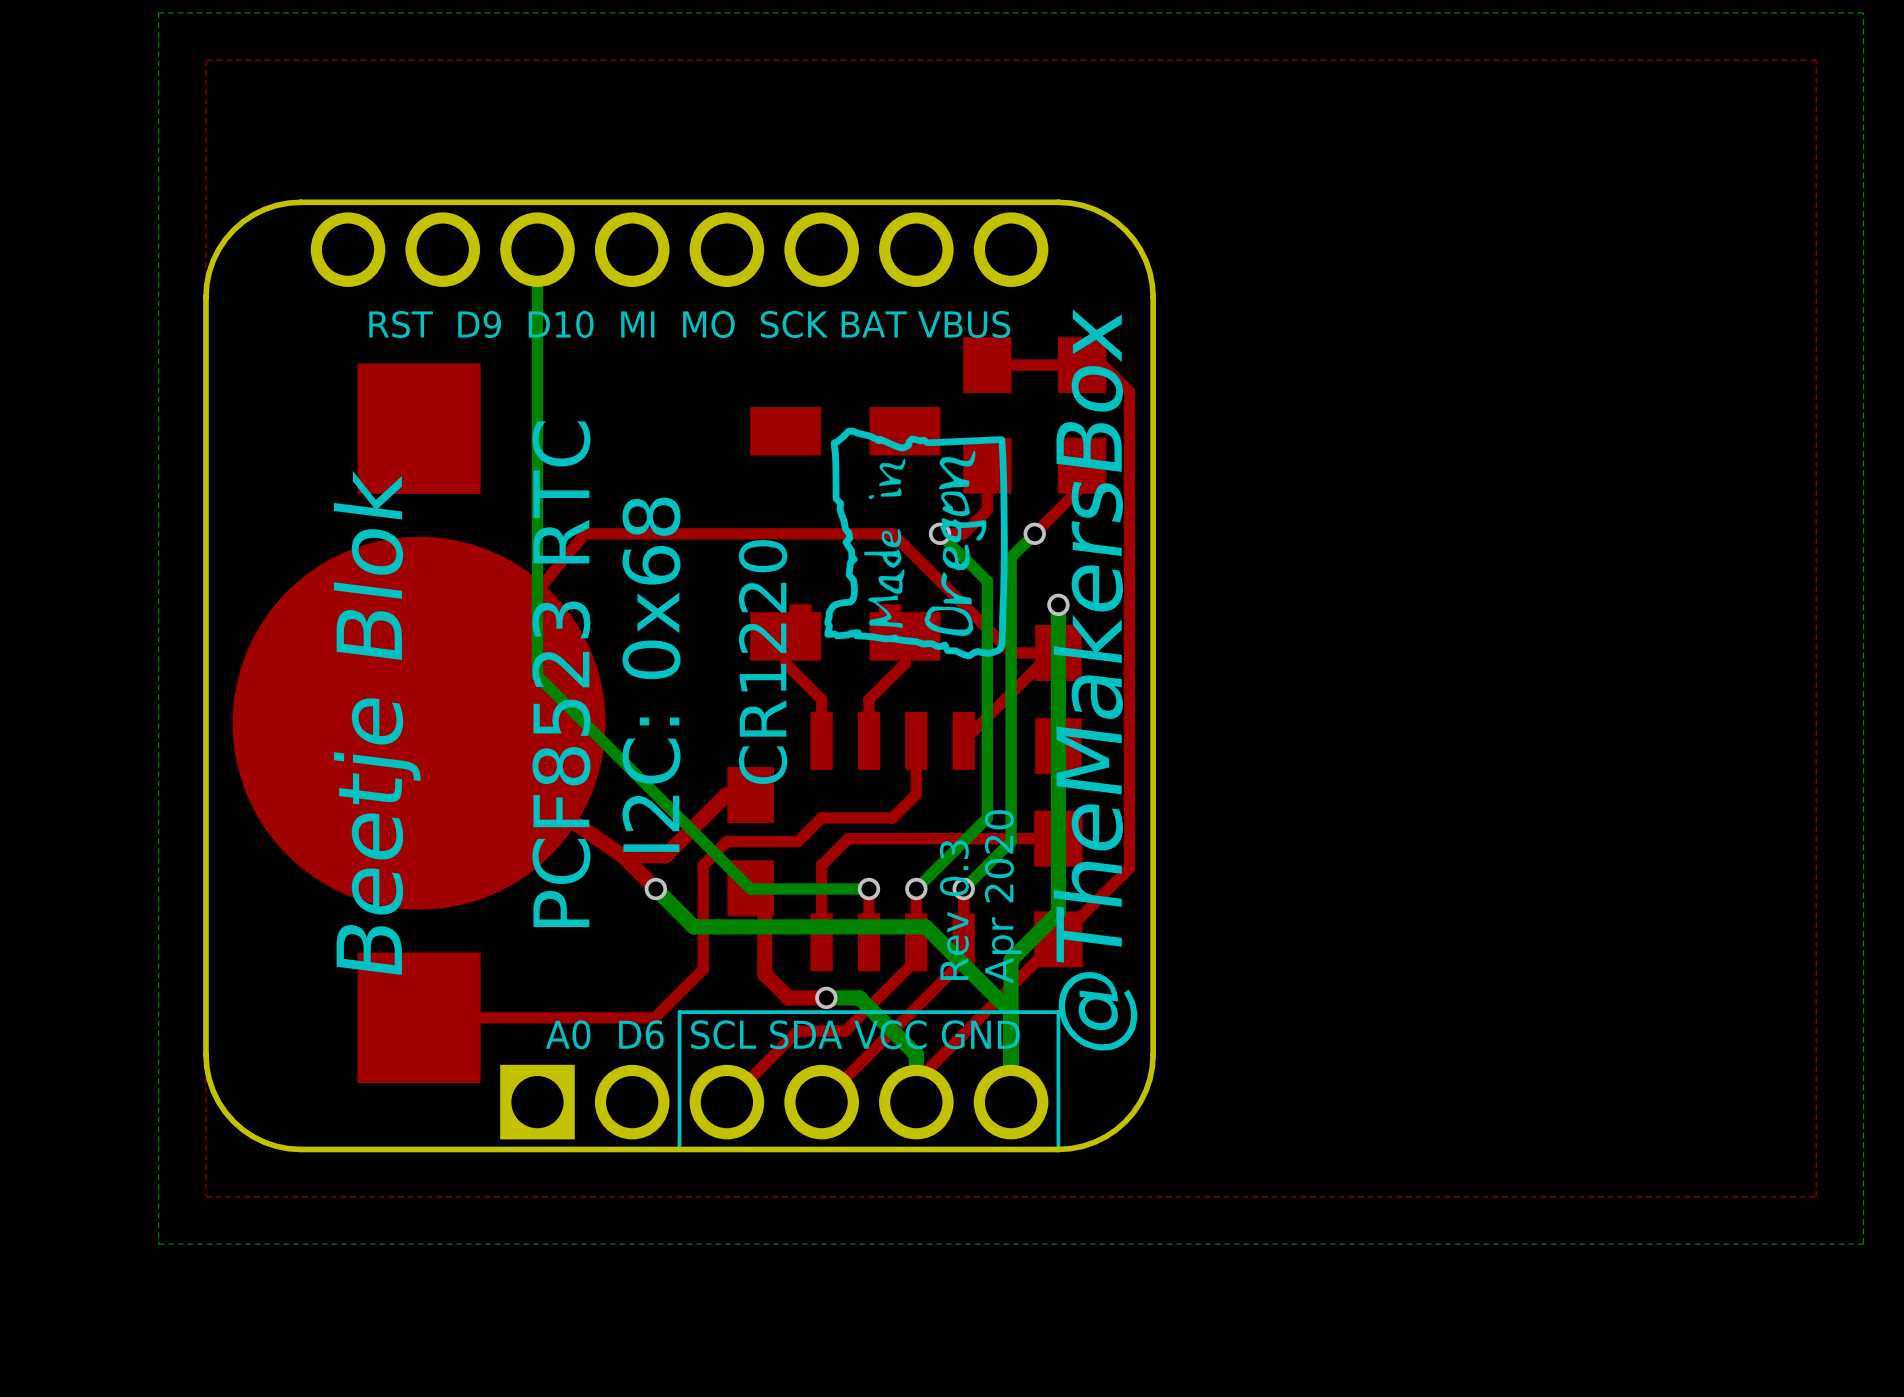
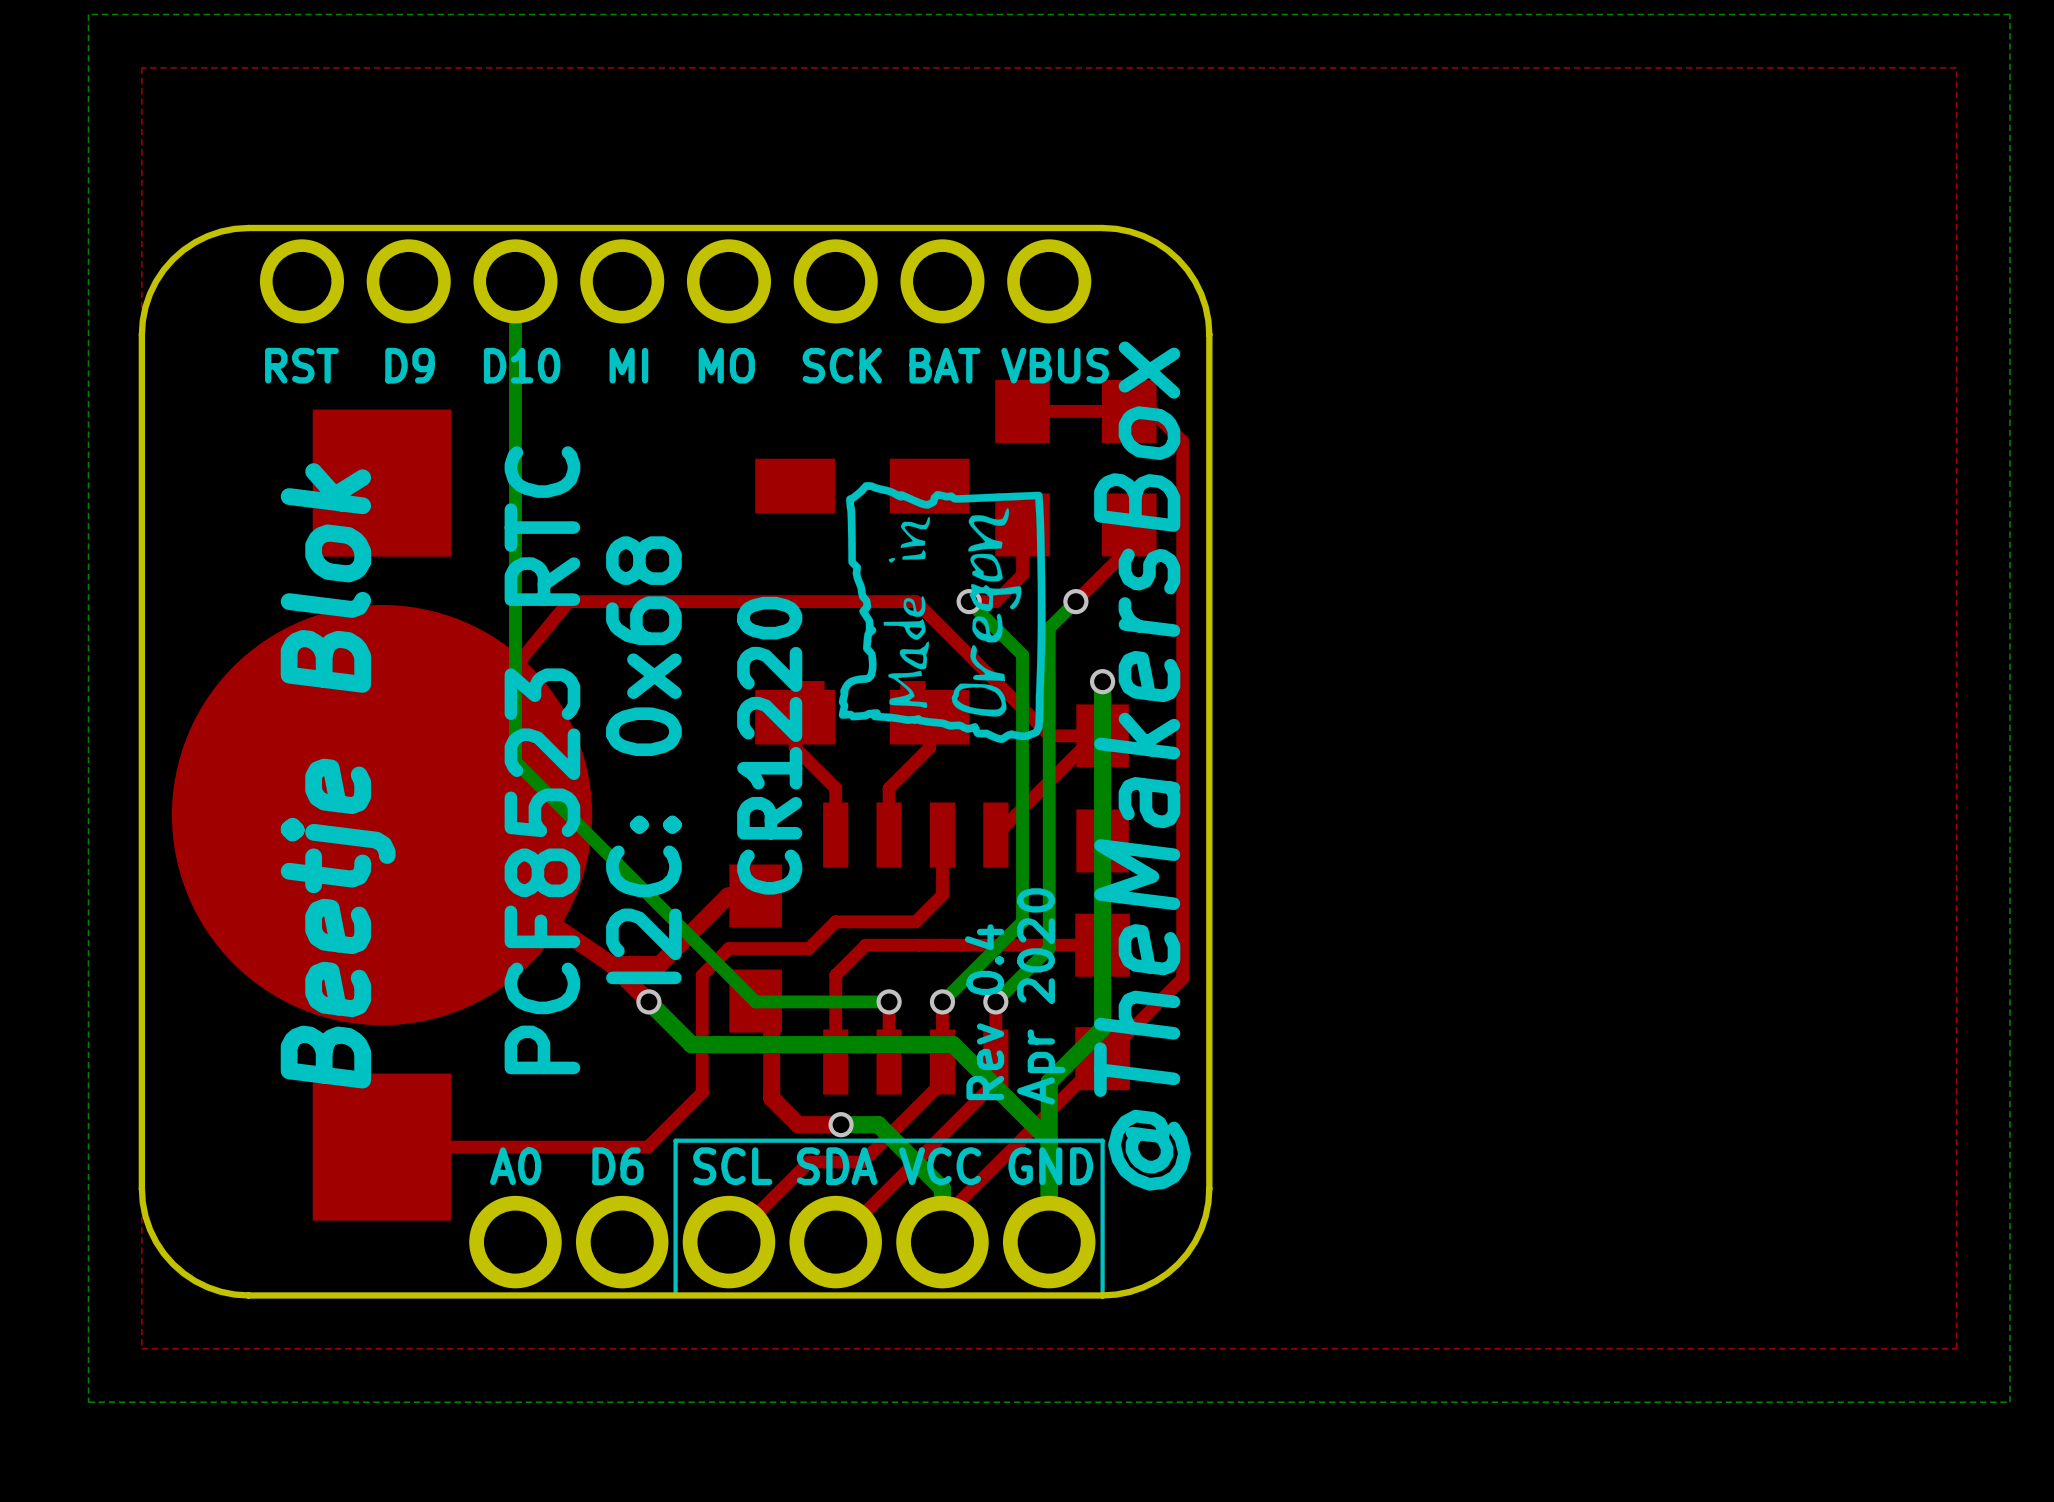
text: Rev 0.3 (954, 910) -> Rev 0.4 (984, 1012)
part footprint: [500, 1010, 1061, 1152] -> [469, 1138, 1105, 1298]

